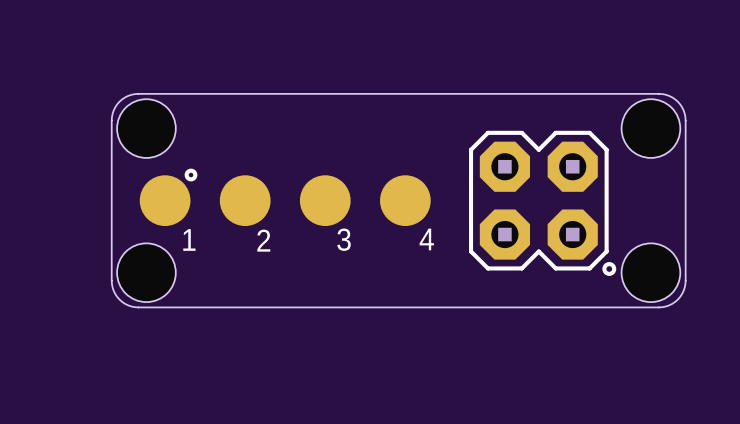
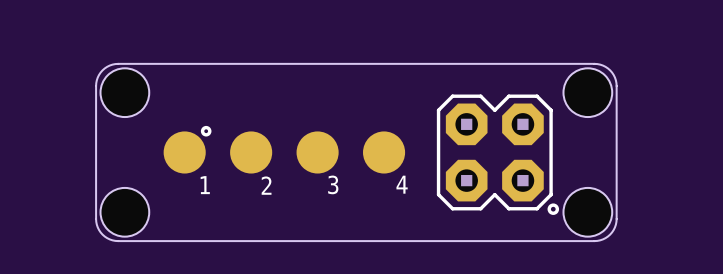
board edge: (138, 93) (128, 95) (119, 101) (113, 110) (111, 120) (111, 284) (115, 294) (122, 301) (138, 307) -> (162, 63) (112, 64) (100, 72) (96, 86) (96, 218) (97, 227) (104, 236) (112, 240) (162, 241)
hole position: (146, 128) -> (124, 92)
hole position: (146, 272) -> (124, 212)

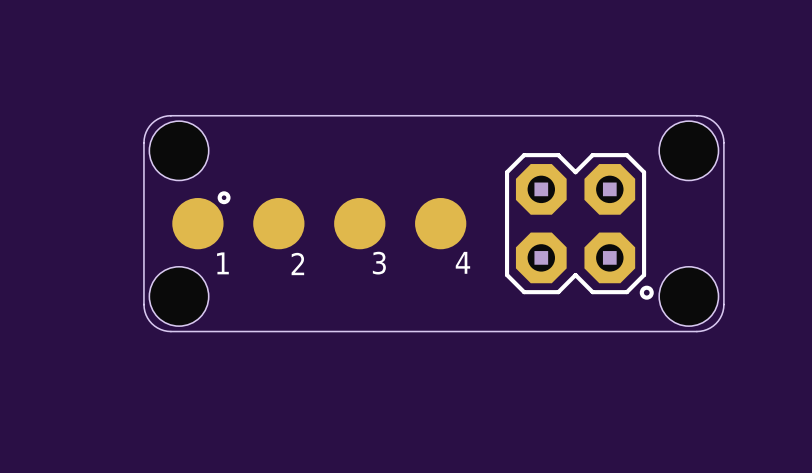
board edge: (162, 63) (112, 64) (100, 72) (96, 86) (96, 218) (97, 227) (104, 236) (112, 240) (162, 241) -> (170, 115) (160, 117) (151, 123) (146, 132) (143, 142) (144, 308) (147, 318) (154, 325) (170, 331)
hole position: (124, 92) -> (179, 150)
hole position: (124, 212) -> (179, 296)

